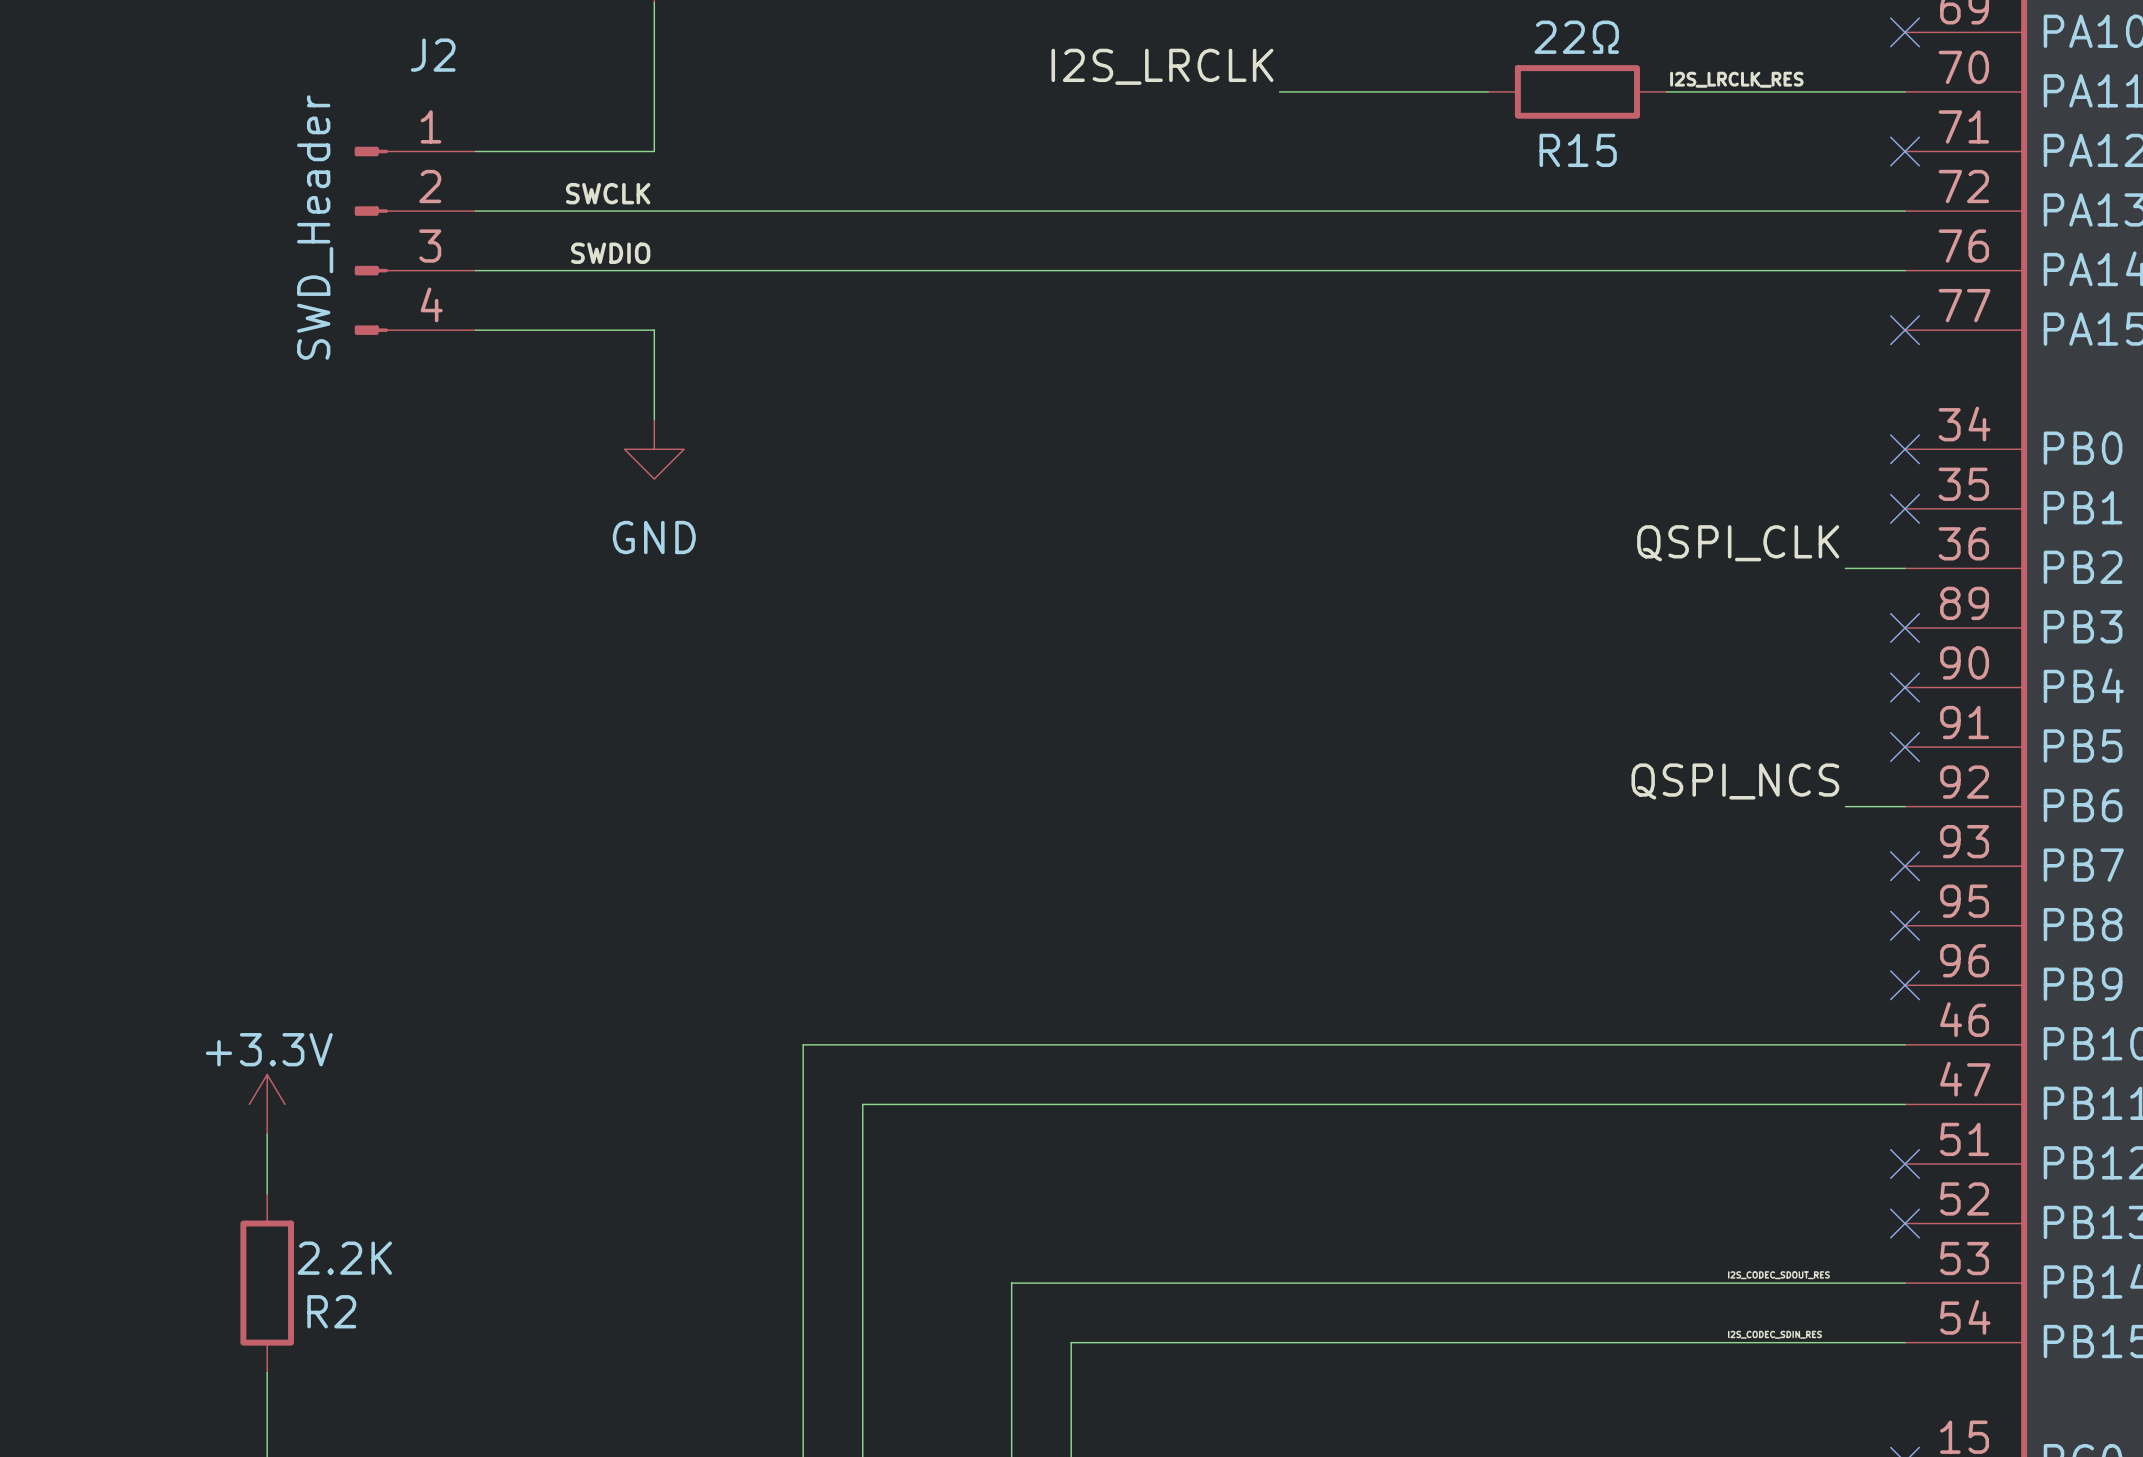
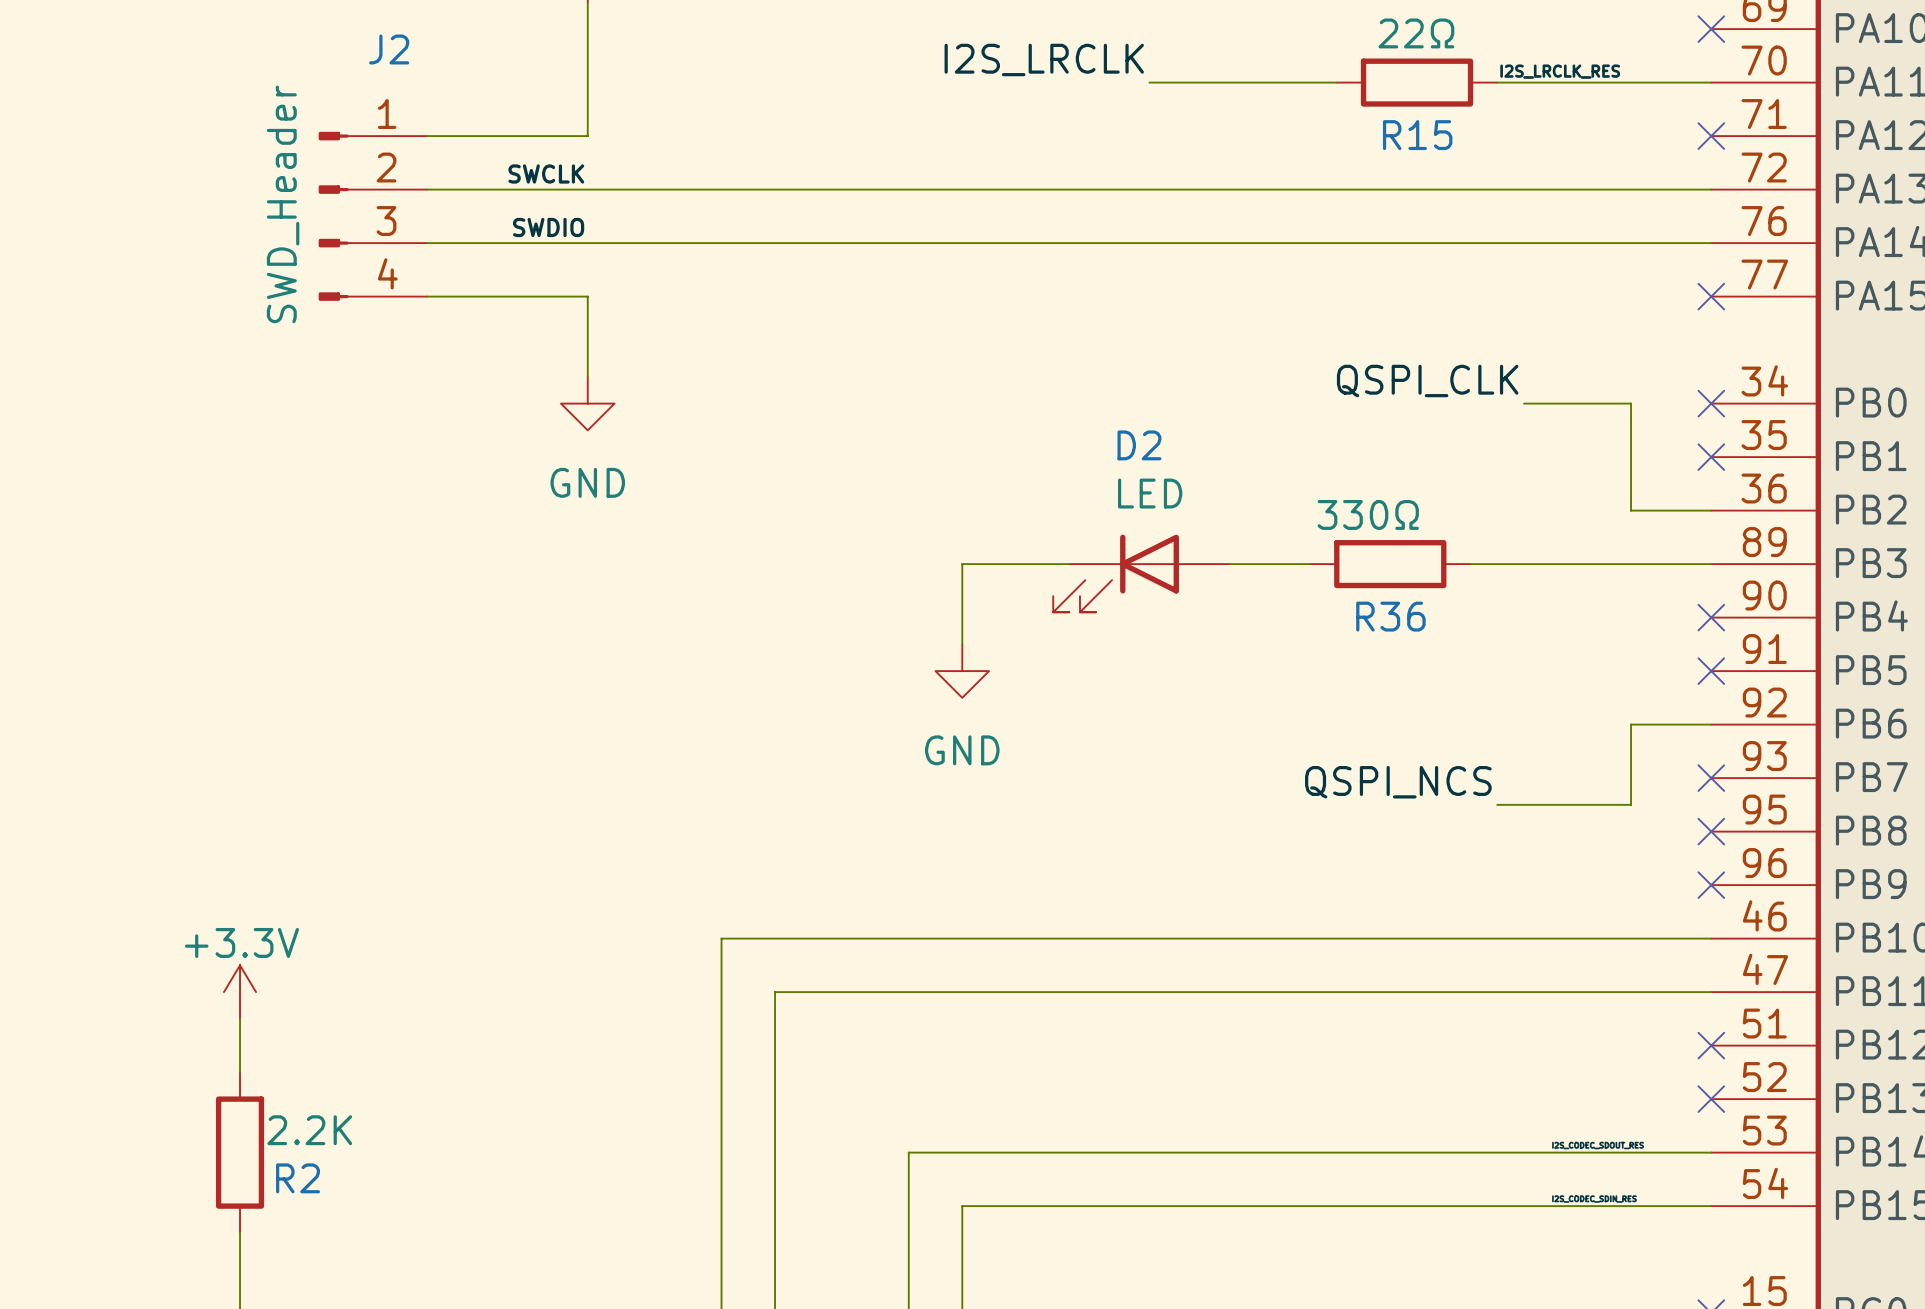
wire: none -> (1524, 403) (1631, 403) (1631, 510) (1657, 510)
label position: QSPI_CLK (1738, 543) -> QSPI_CLK (1427, 381)
wire: none -> (1069, 564) (962, 564) (962, 644)
wire: none -> (1229, 564) (1310, 564)
R36: none -> 330Ω (1390, 564)
wire: none -> (1470, 564) (1711, 564)
no-connect mark: (1905, 627) -> none
D2: none -> LED (1141, 573)
power symbol: none -> GND (962, 671)
label position: QSPI_NCS (1735, 781) -> QSPI_NCS (1398, 782)
wire: none -> (1657, 724) (1631, 724) (1631, 804) (1497, 804)

